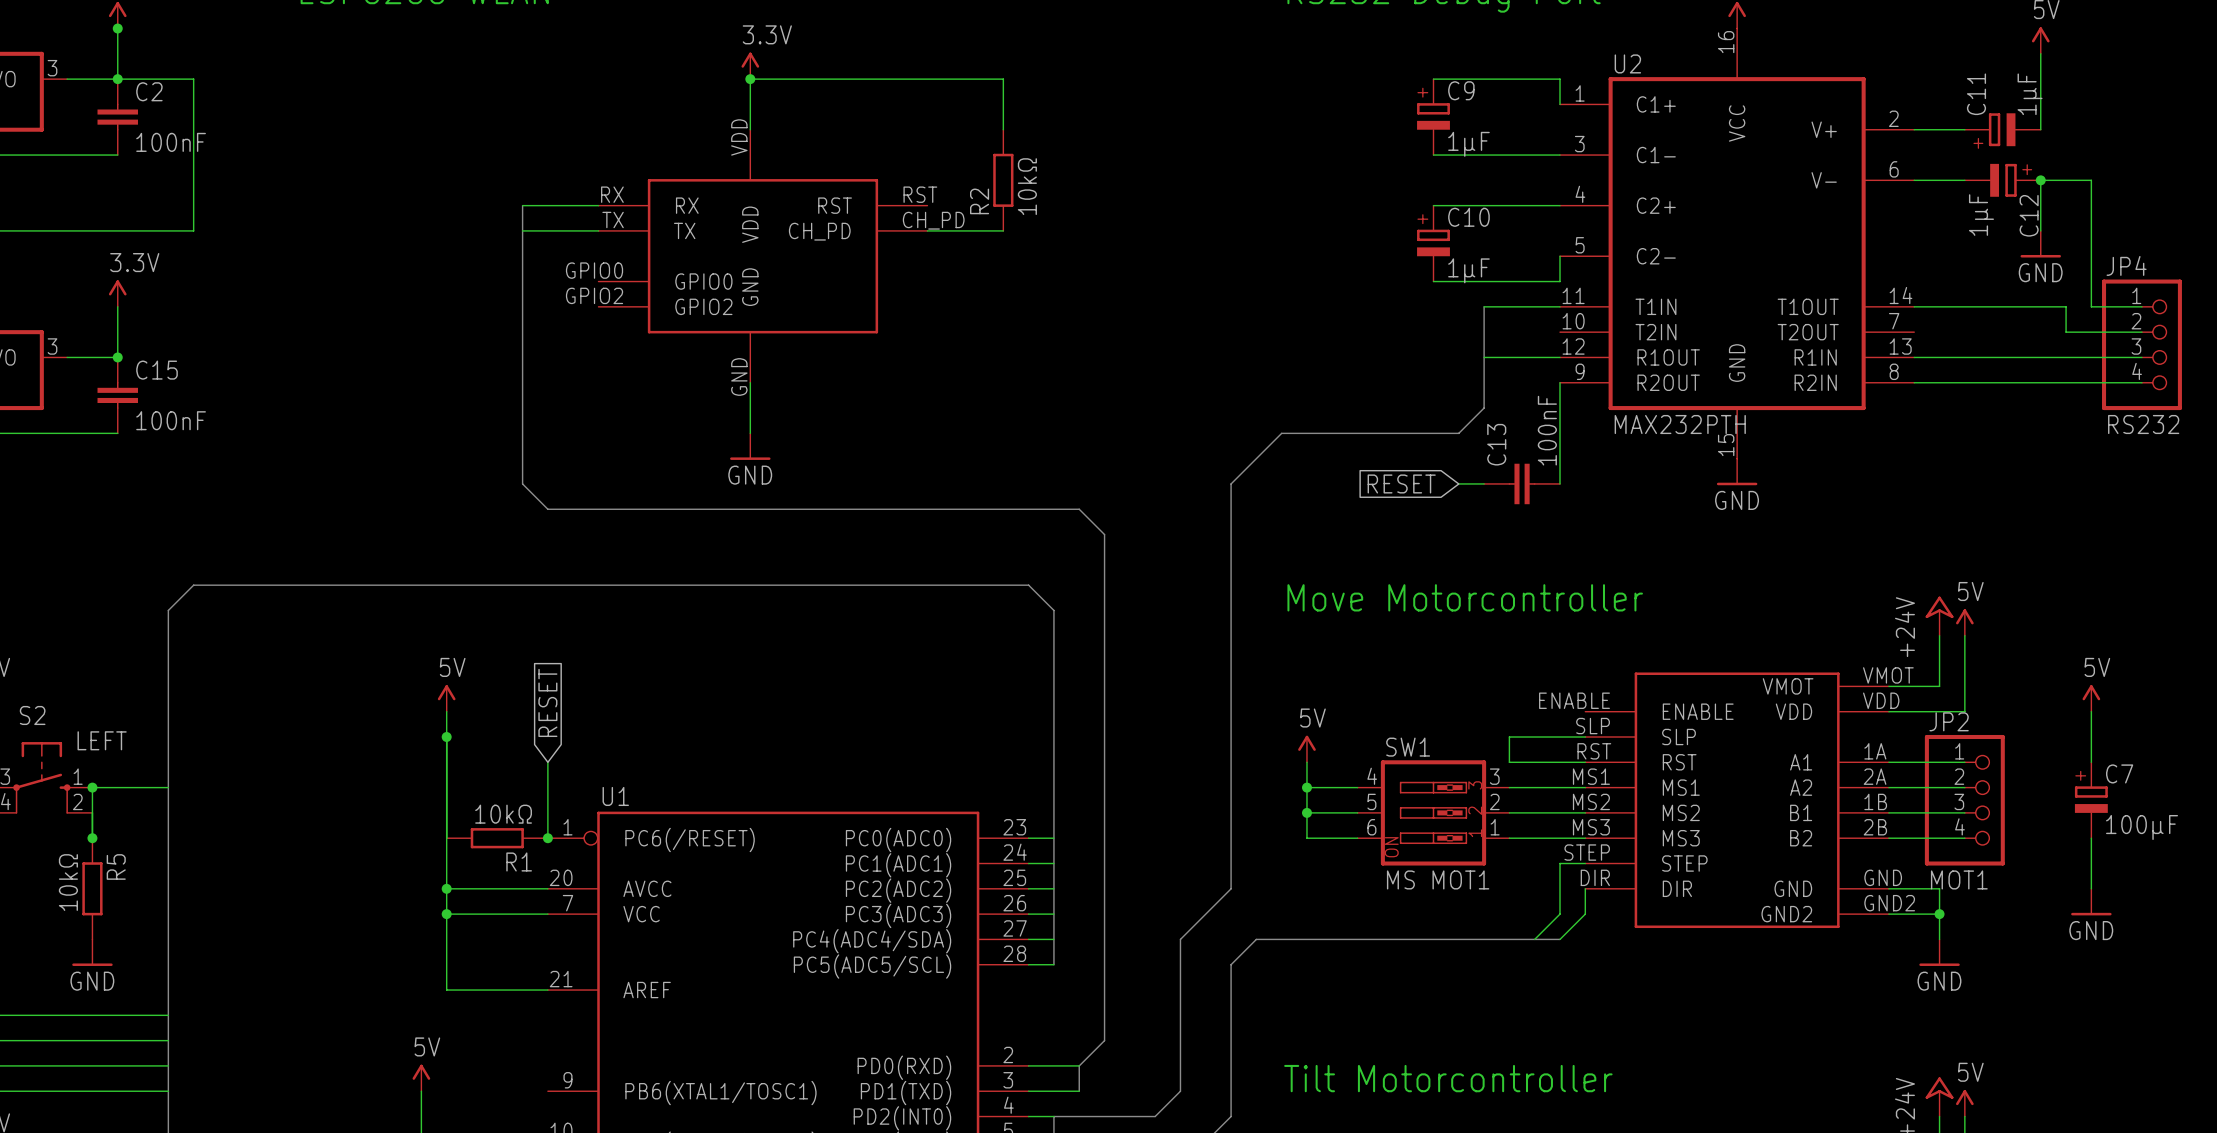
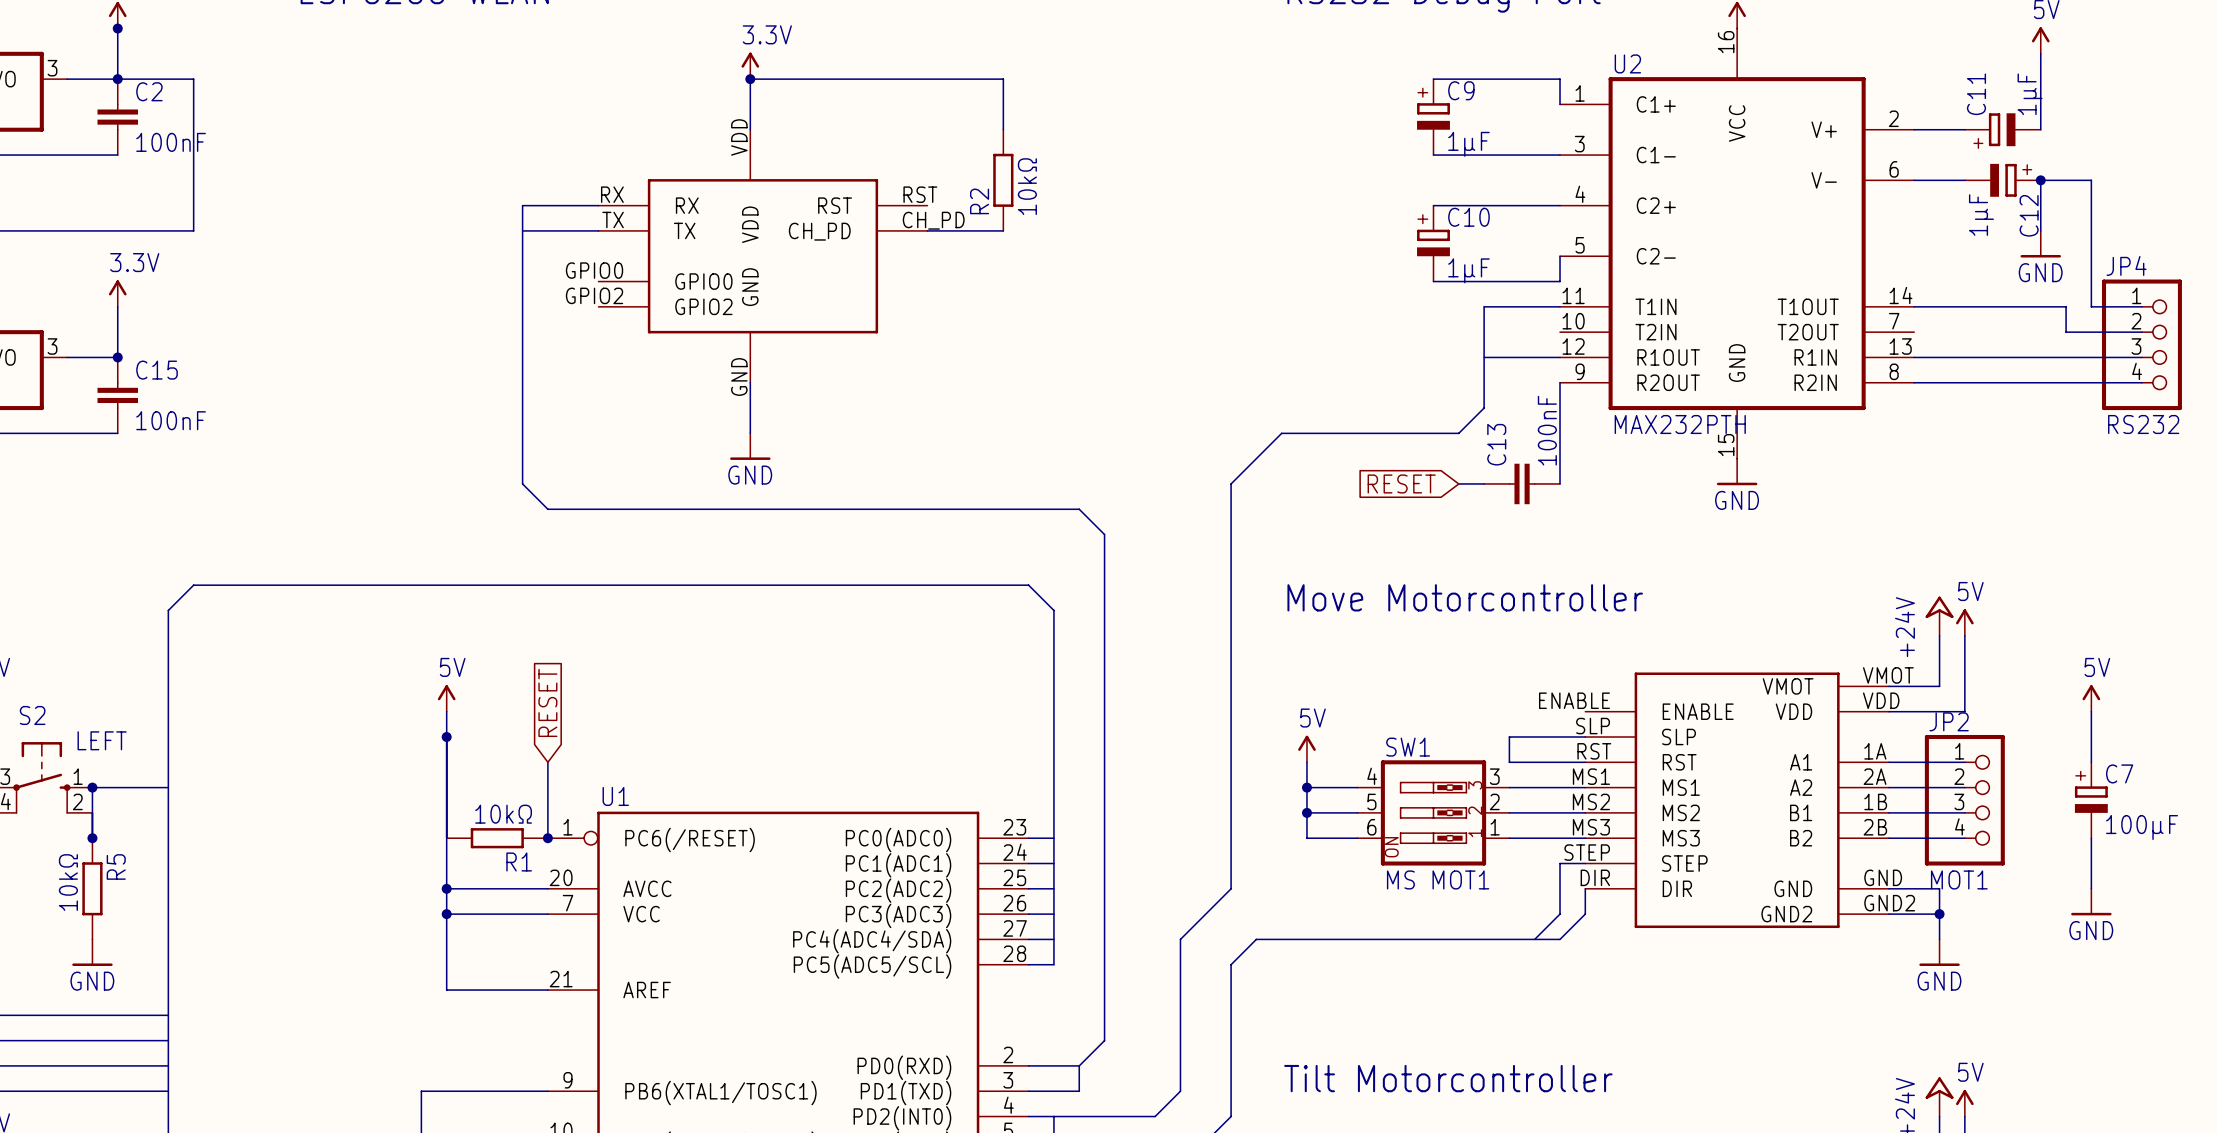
power symbol: 5V (421, 1077) -> none
wire: none -> (421, 1091) (547, 1091)

